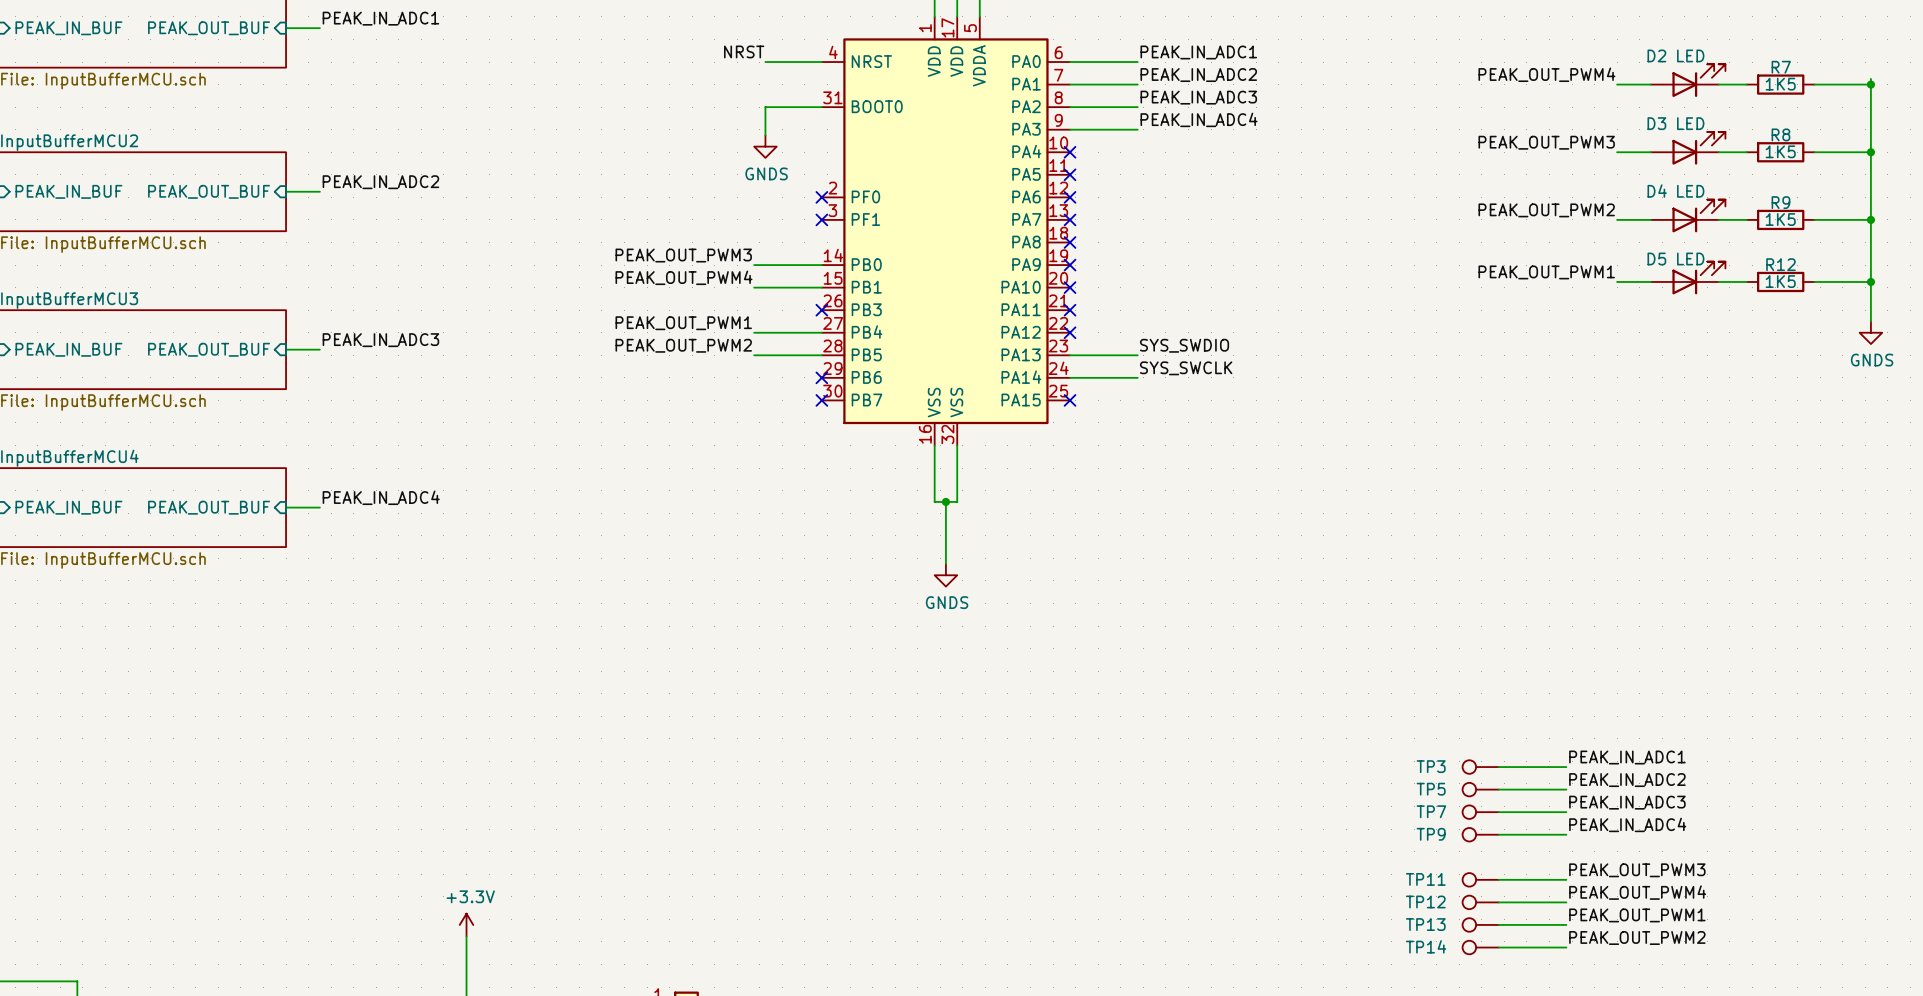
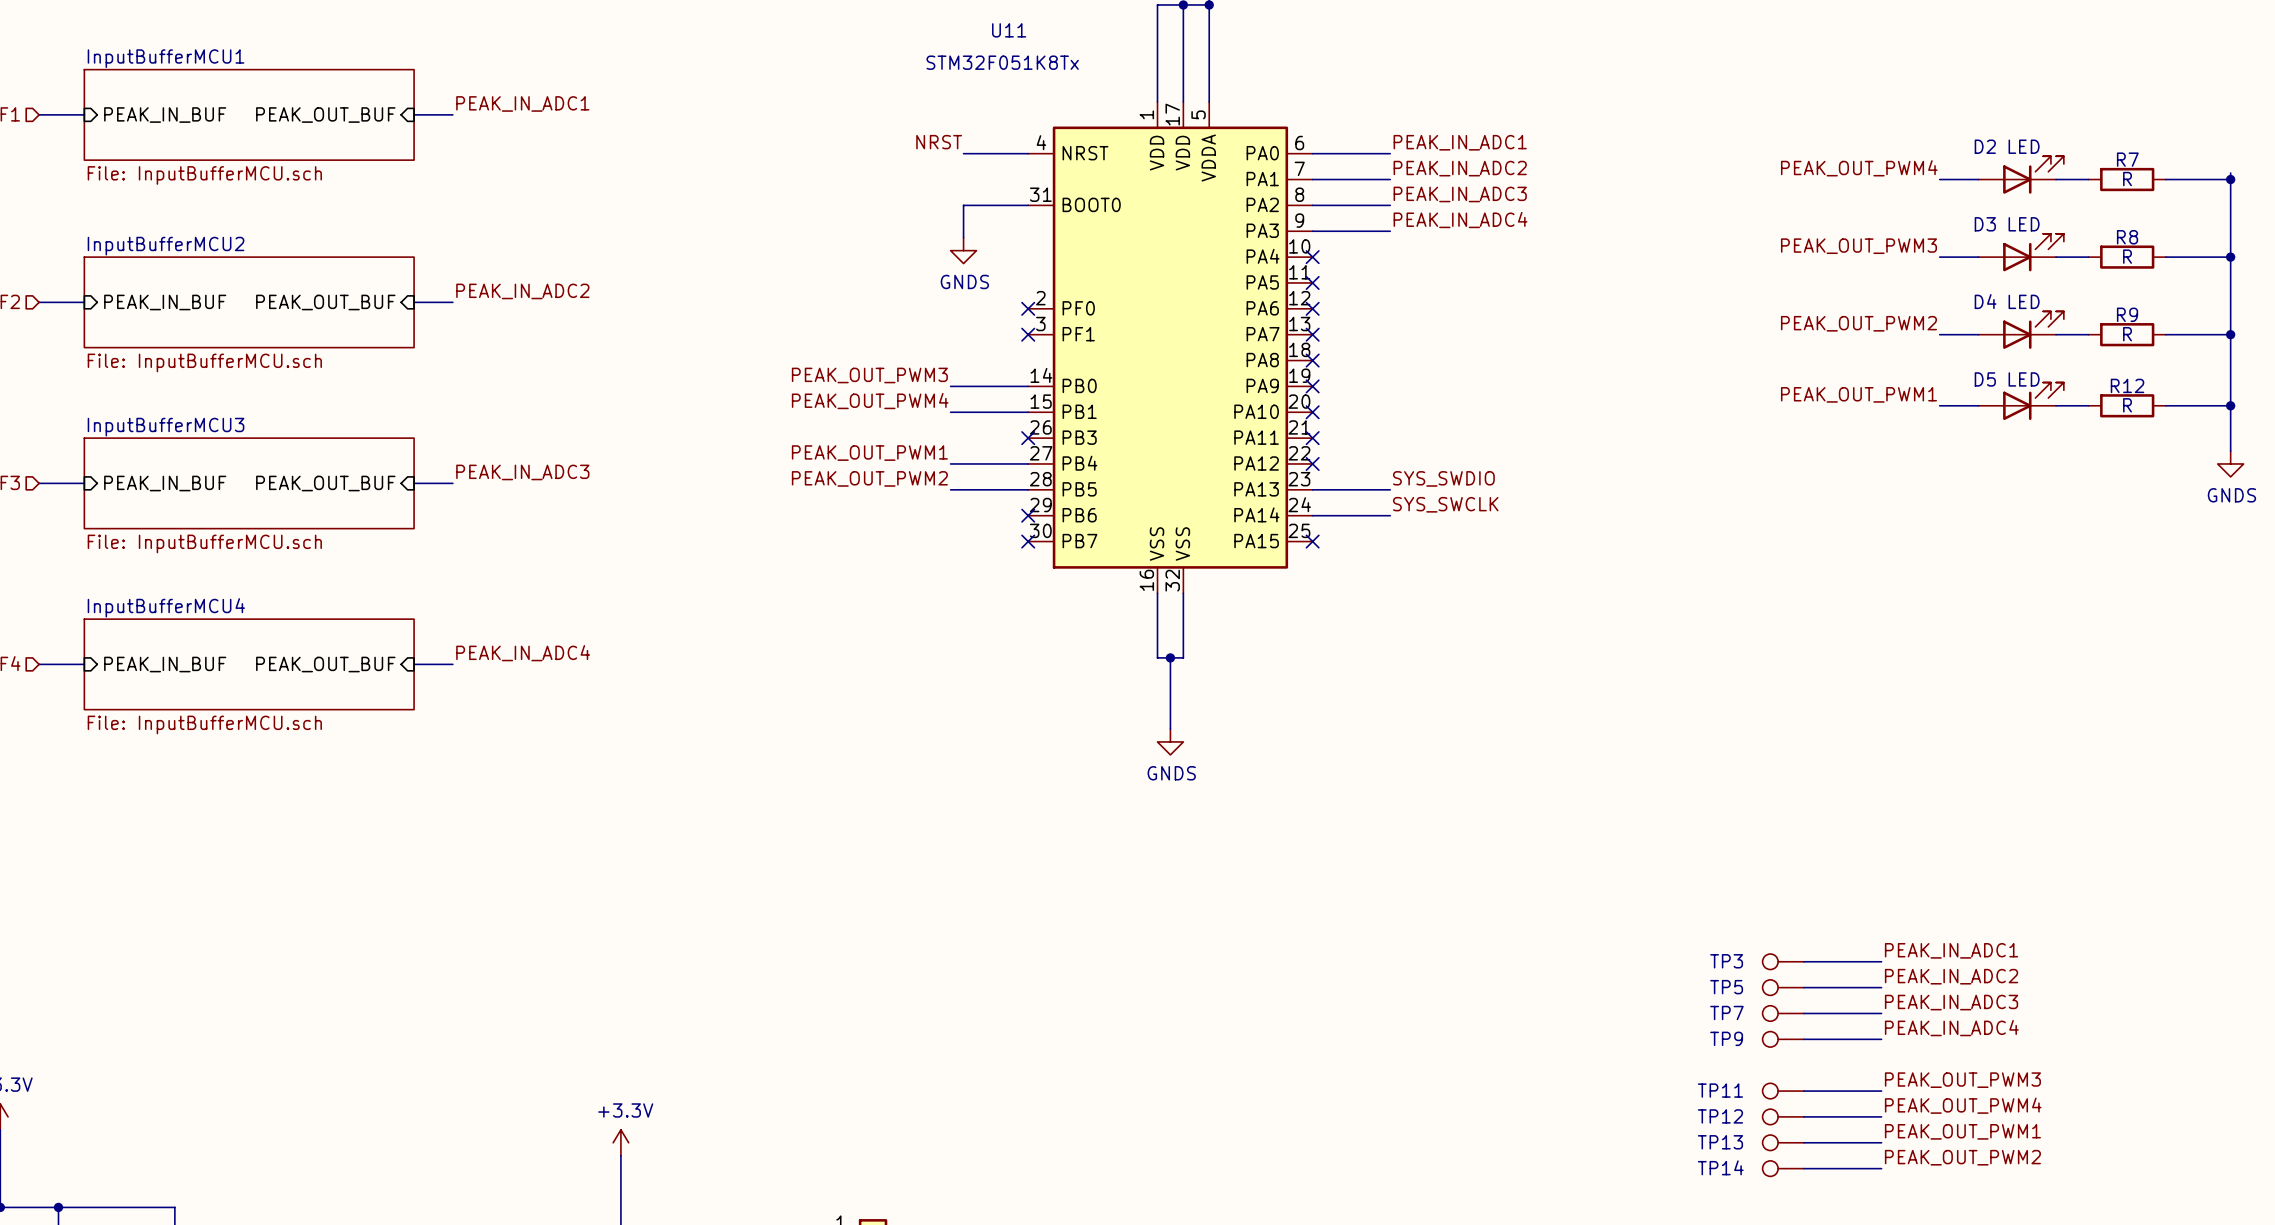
R7 value: 1K5 (1780, 84) -> R (2127, 179)
R8 value: 1K5 (1780, 151) -> R (2127, 256)
R9 value: 1K5 (1780, 219) -> R (2127, 334)
R12 value: 1K5 (1780, 281) -> R (2127, 405)

